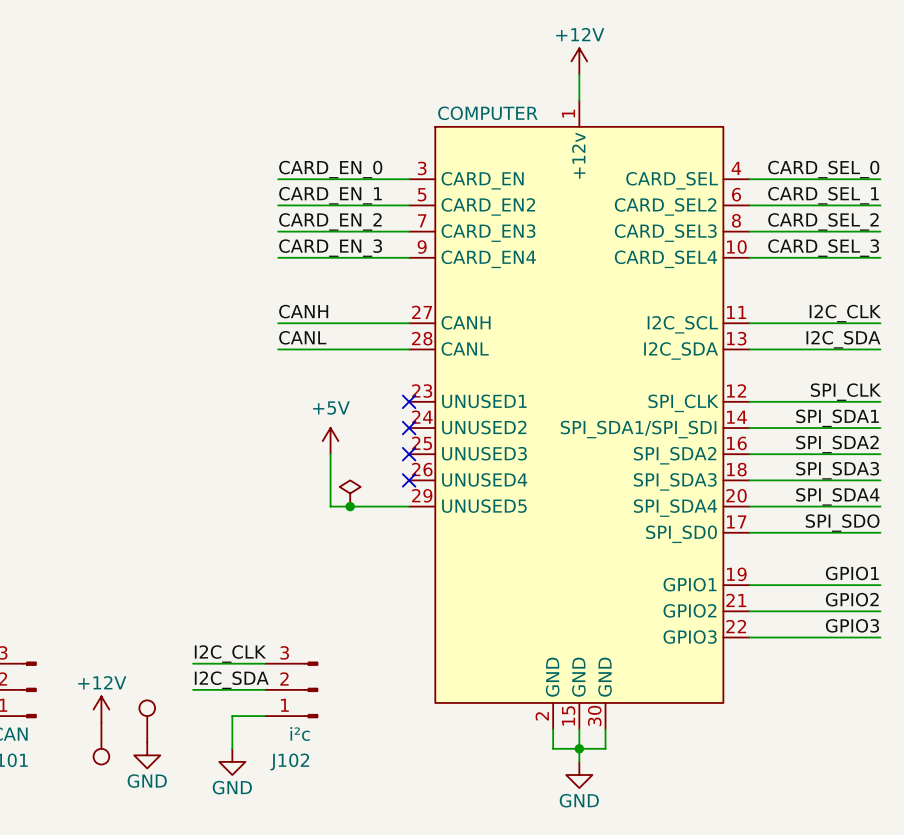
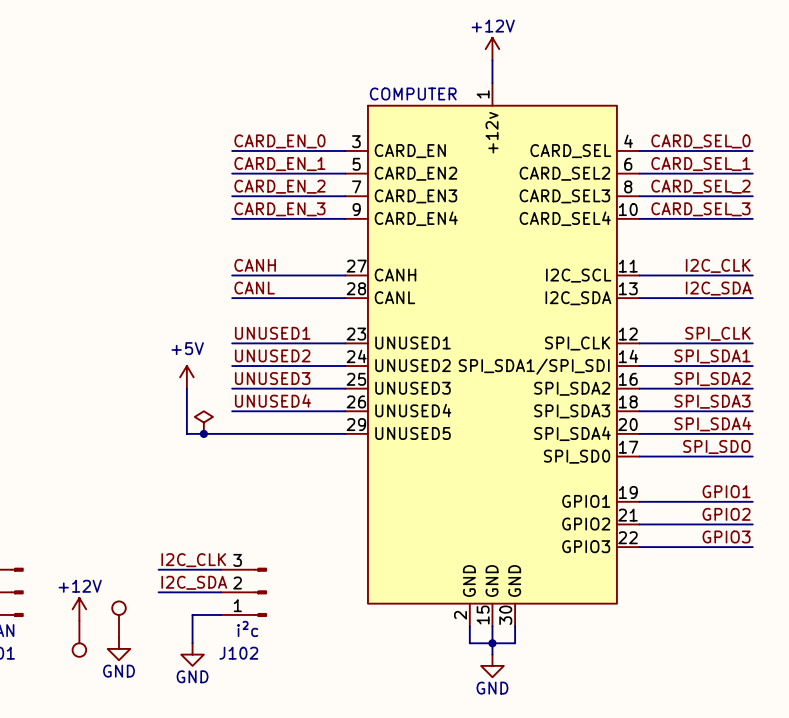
label: none -> UNUSED1 (272, 333)
wire: none -> (232, 343) (345, 343)
no-connect mark: (409, 401) -> none
label: none -> UNUSED2 (272, 355)
wire: none -> (232, 366) (345, 366)
no-connect mark: (409, 428) -> none
power symbol position: +5V (330, 441) -> +5V (186, 377)
label: none -> UNUSED3 (272, 378)
wire: none -> (232, 388) (345, 388)
wire: (330, 454) (330, 506) -> (186, 388) (186, 433) (277, 433)
no-connect mark: (409, 454) -> none
label: none -> UNUSED4 (272, 400)
wire: none -> (232, 411) (345, 411)
no-connect mark: (409, 480) -> none
power symbol position: (350, 493) -> (203, 422)
junction: none -> (203, 433)
junction: (350, 506) -> none

